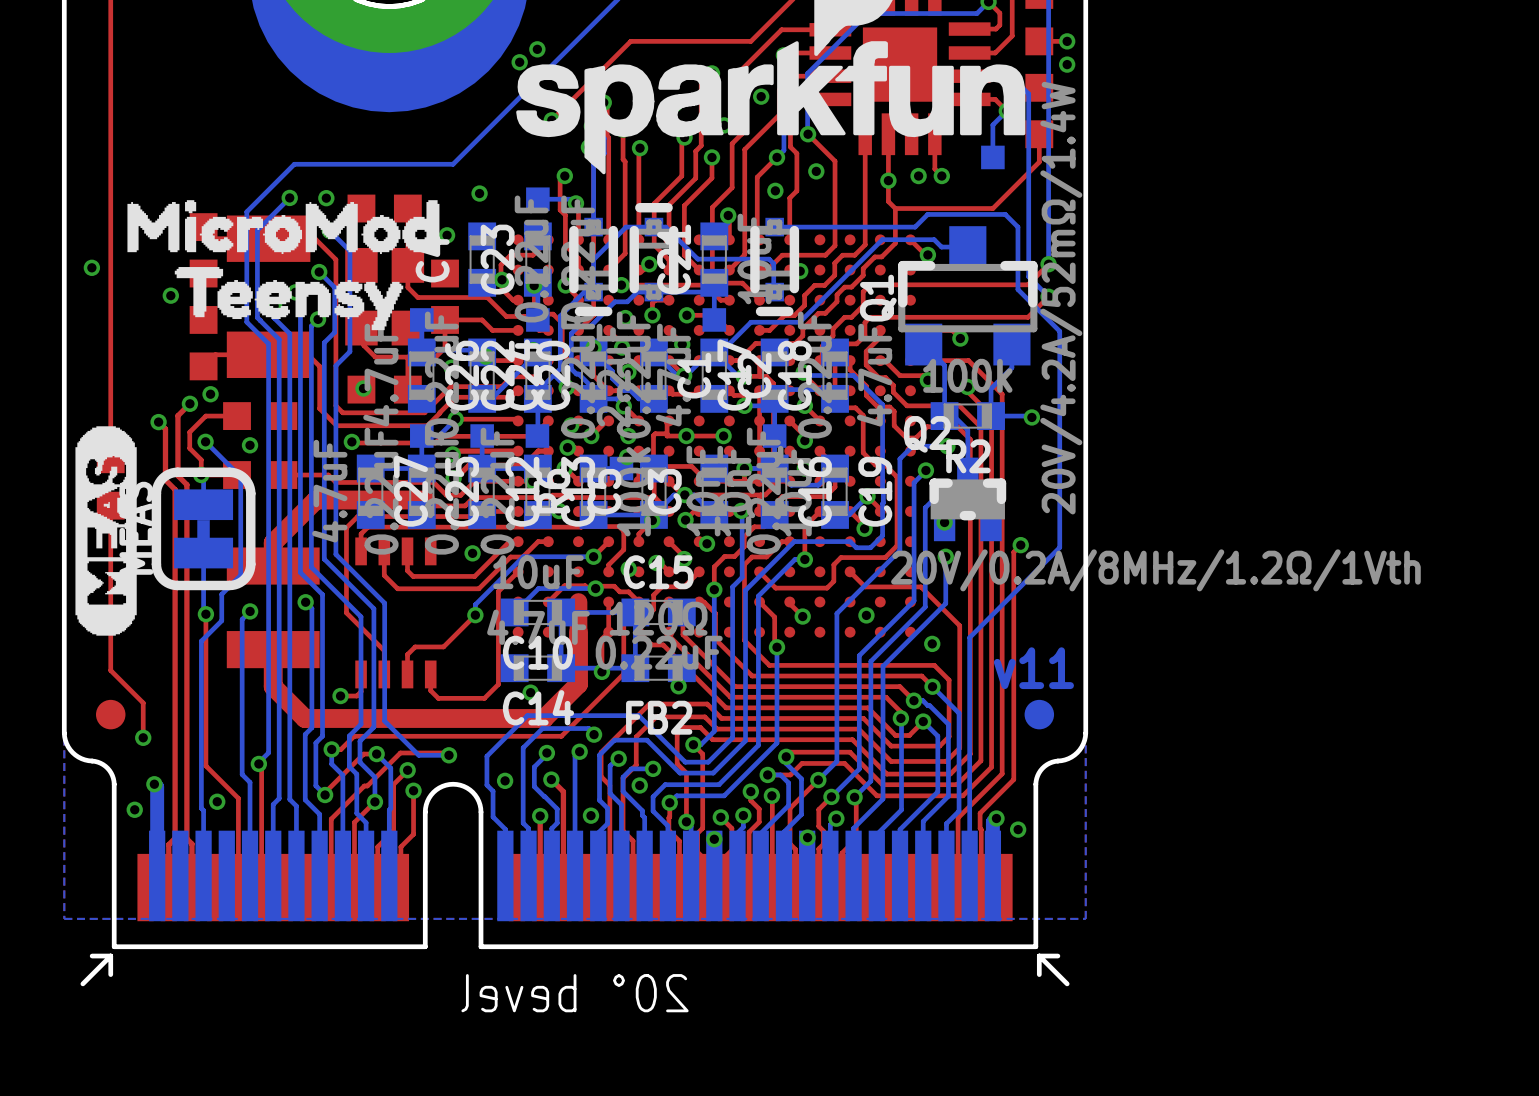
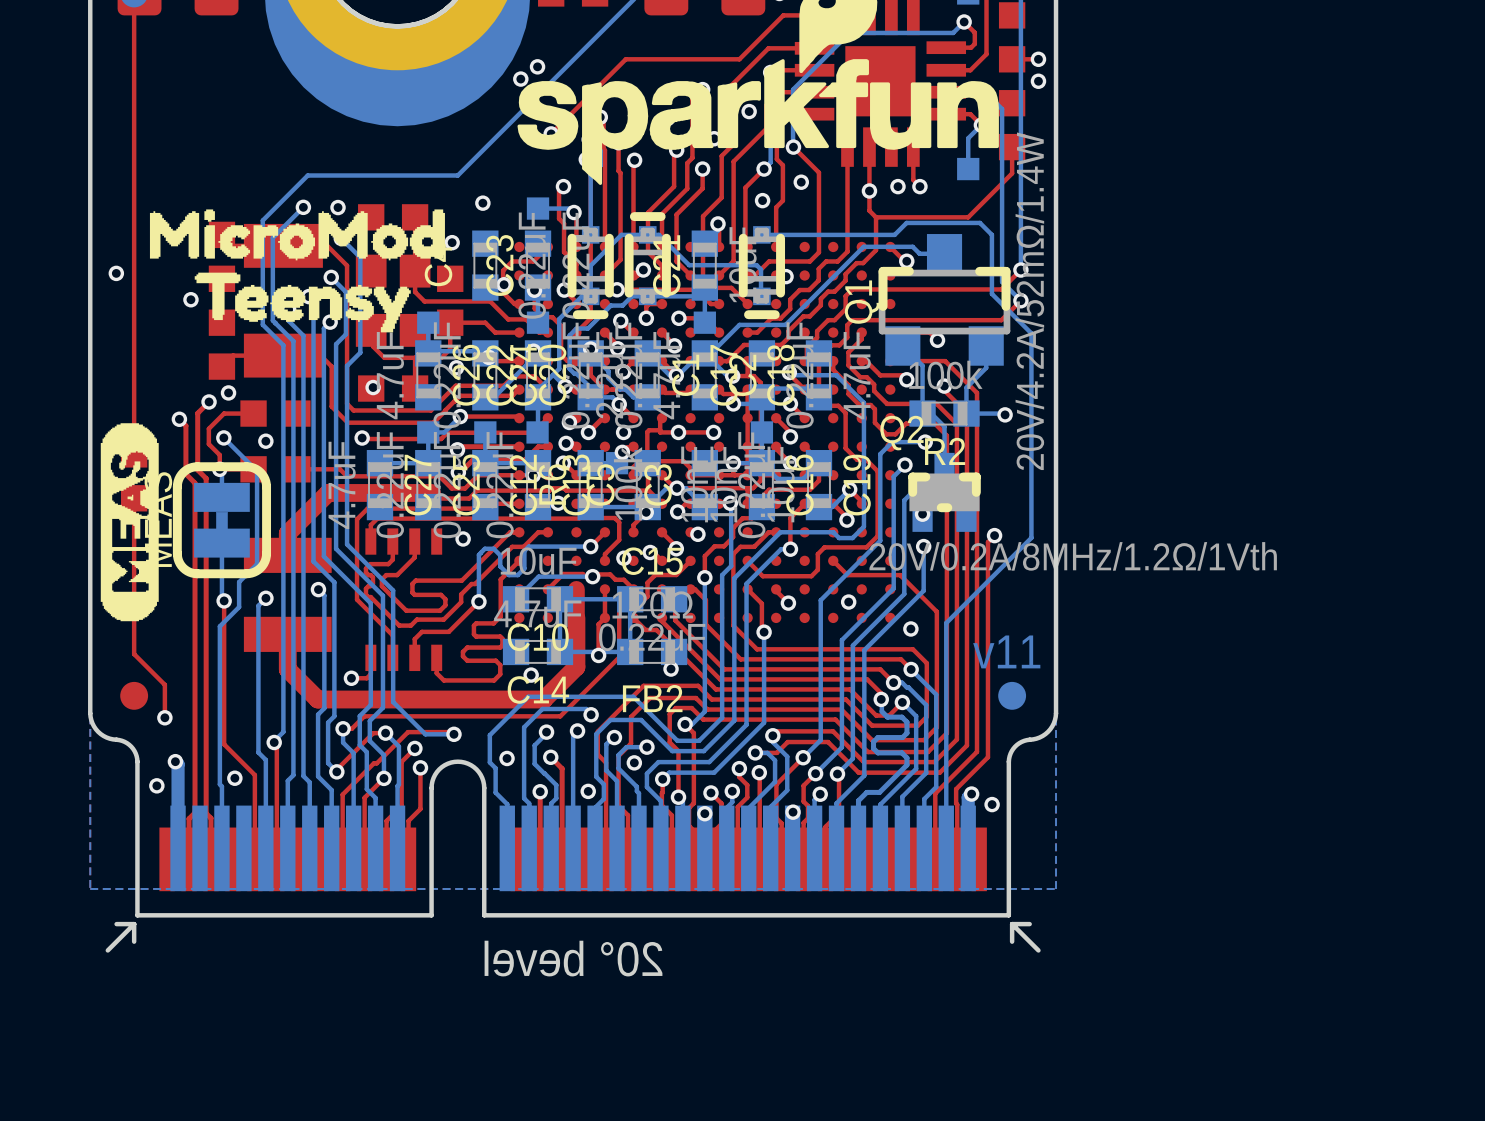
top track: (509, 541) (474, 576) (413, 576) (407, 568) -> (511, 532) (461, 580) (415, 580) (412, 583) (412, 592) (414, 594) (441, 594) (445, 599) (445, 605) (440, 610) (406, 610) (381, 586) (381, 579) (386, 575) (397, 575) (414, 557)
via position: (472, 553) -> (463, 538)
bottom track: (528, 556) (523, 556) (475, 604) -> (528, 546) (524, 550) (524, 568) (517, 575) (509, 575) (500, 566) (500, 555) (493, 548) (484, 548) (478, 554) (478, 591)
top track: (384, 570) (384, 575) (397, 588) (478, 588) -> (392, 559) (388, 564) (370, 564) (365, 568) (365, 572) (372, 577) (372, 583) (365, 588) (365, 594) (370, 597) (399, 625) (410, 625) (416, 619) (443, 619) (461, 602) (461, 594) (482, 576)
top track: (498, 630) (498, 684) (484, 698) -> (500, 616) (493, 623) (476, 623) (473, 625) (473, 634) (476, 636) (500, 636) (502, 638) (502, 645) (500, 647) (467, 647) (462, 651) (462, 656) (467, 660) (495, 660) (500, 665) (500, 674) (494, 680) (487, 680)
bottom track: (901, 731) (901, 809) (876, 834) -> (881, 711) (887, 717) (901, 717) (906, 722) (906, 733) (902, 737) (877, 737) (873, 741) (873, 748) (877, 752) (901, 752) (906, 757) (906, 765) (879, 792) (866, 792) (858, 800) (858, 809)

